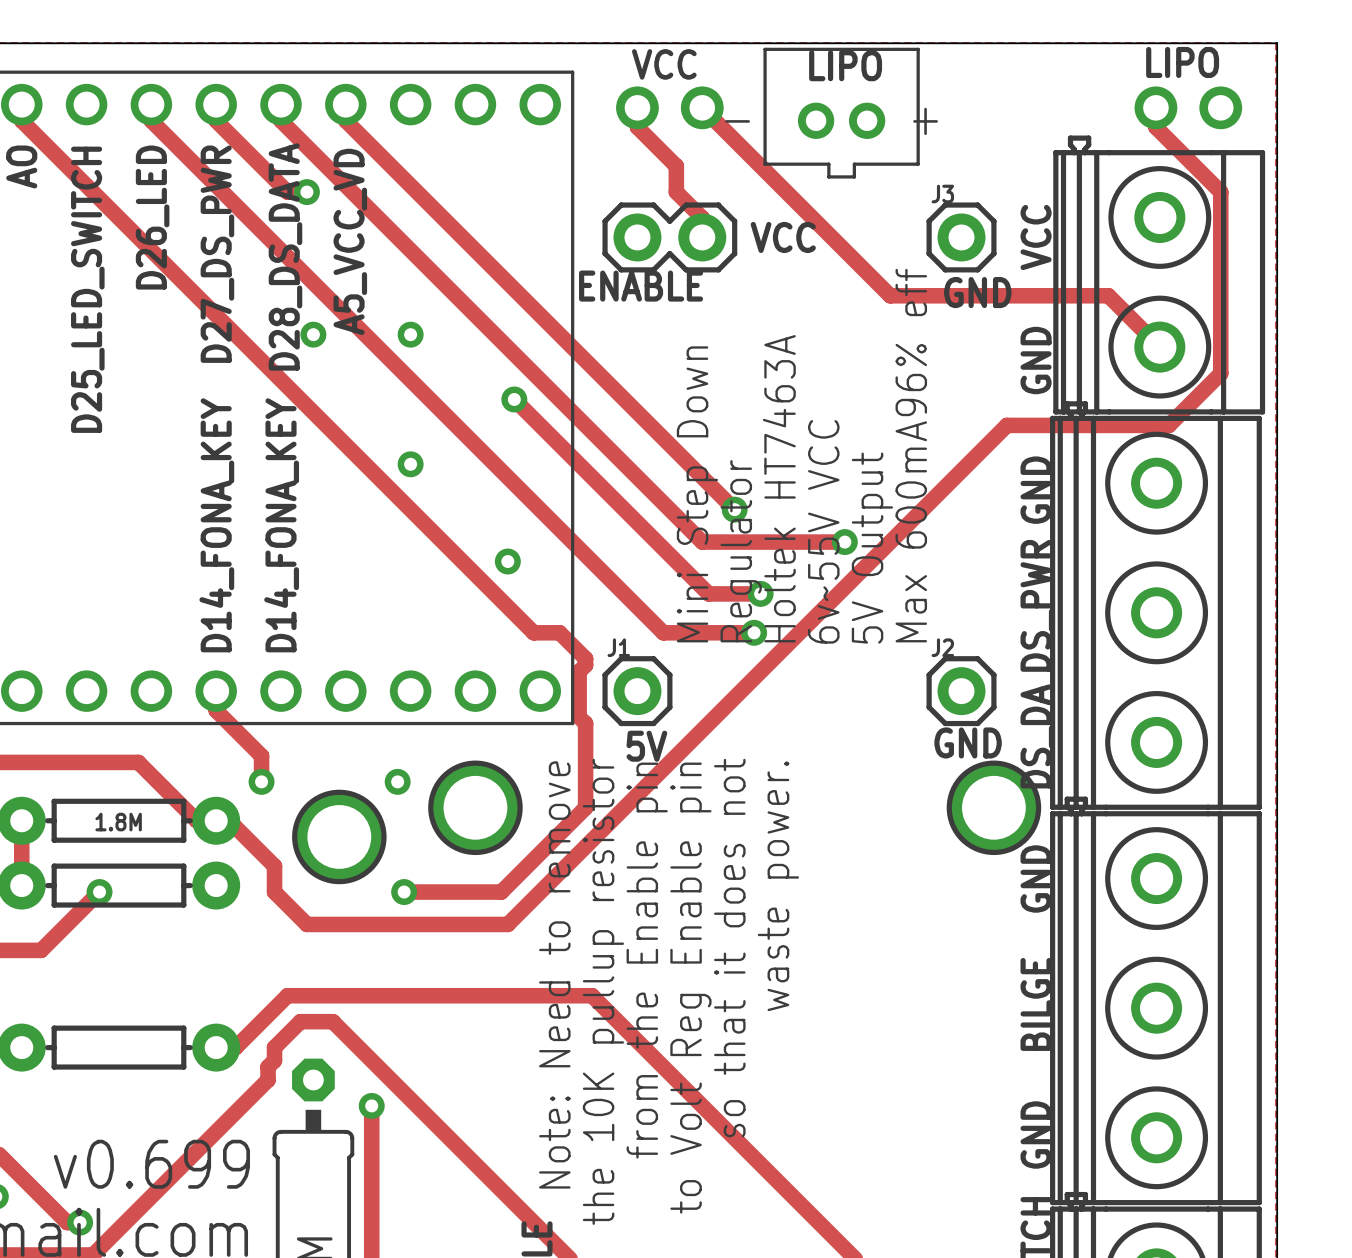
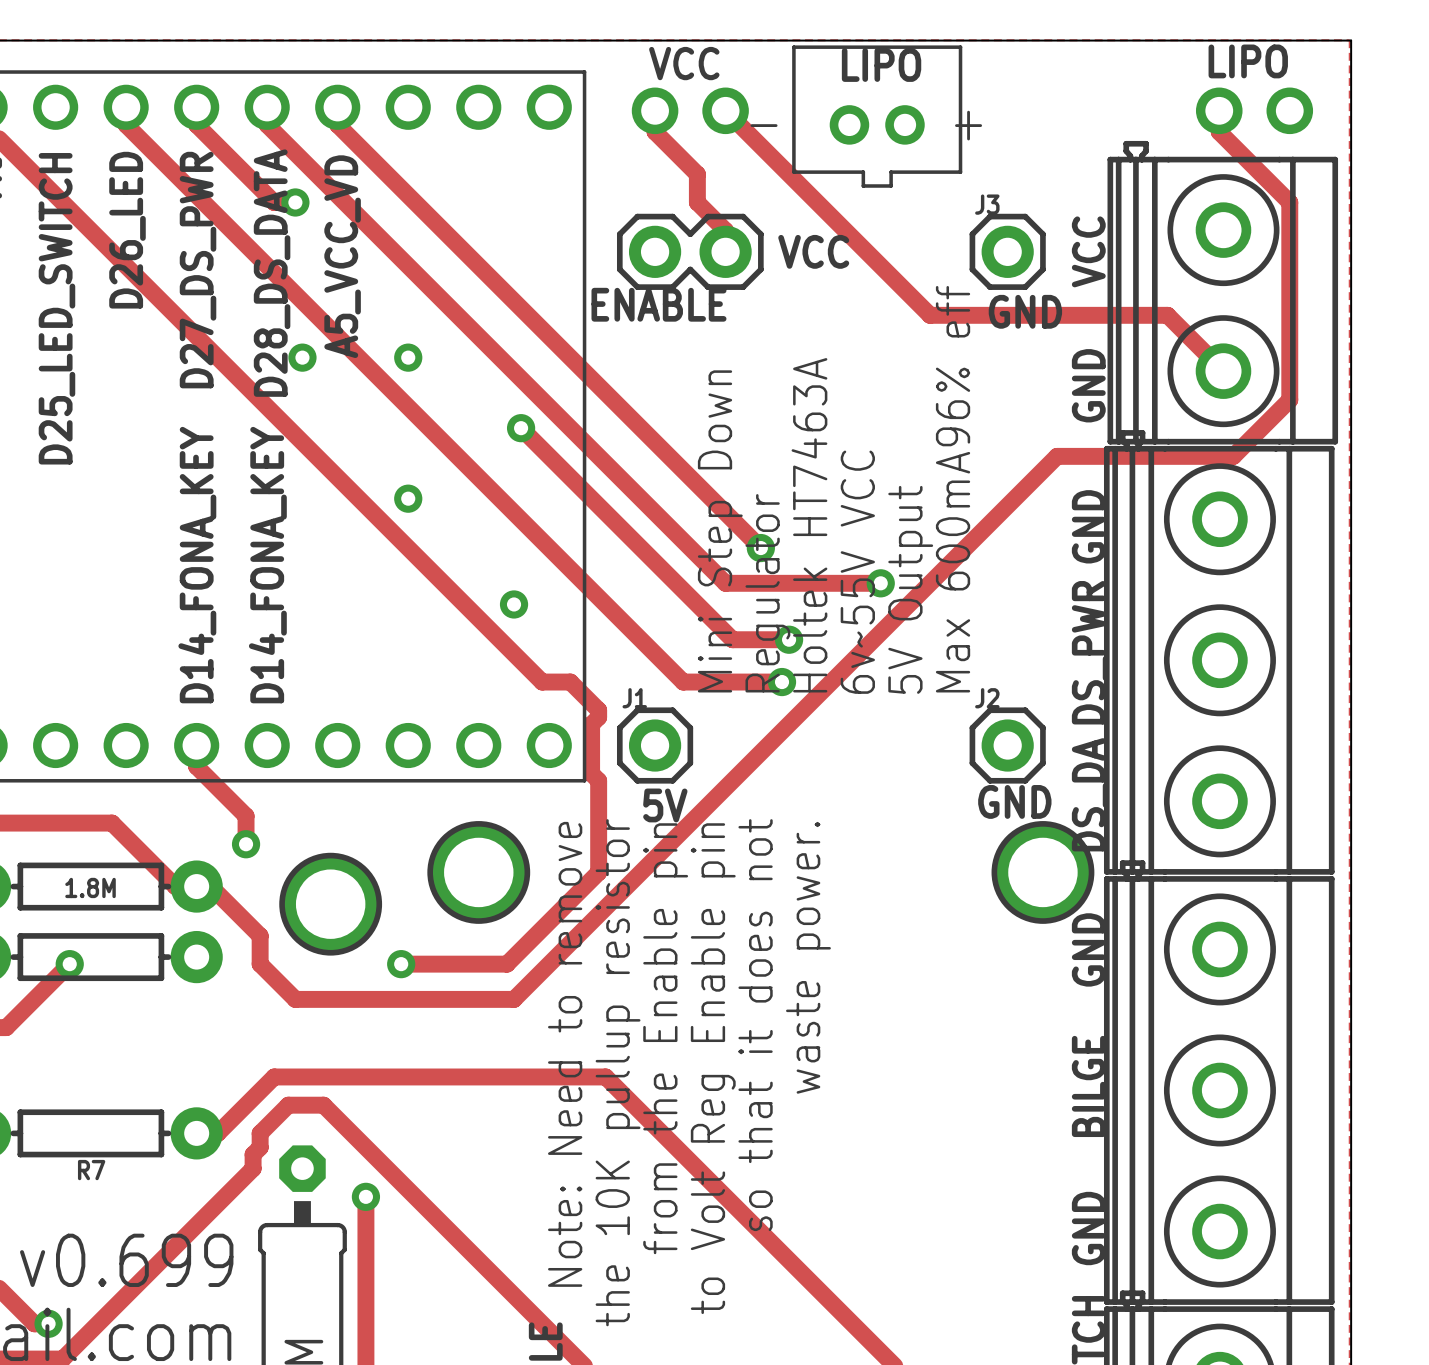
via: (397, 781) -> none
R7 name: none -> R7 (91, 1170)

